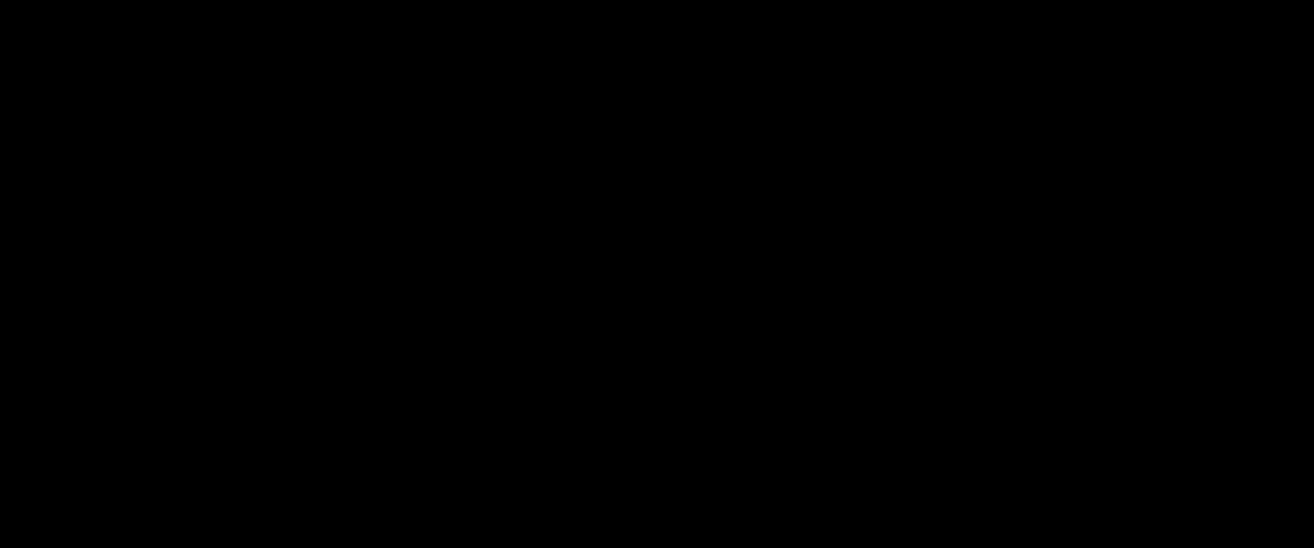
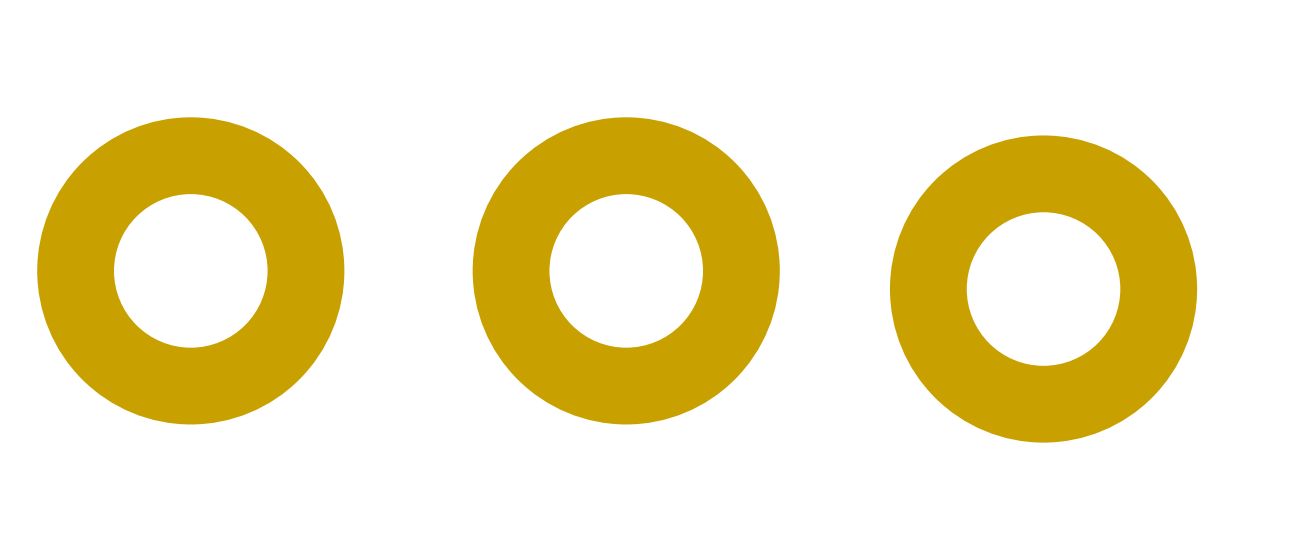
part: none -> (190, 270)
part: none -> (626, 270)
part: none -> (1043, 289)

